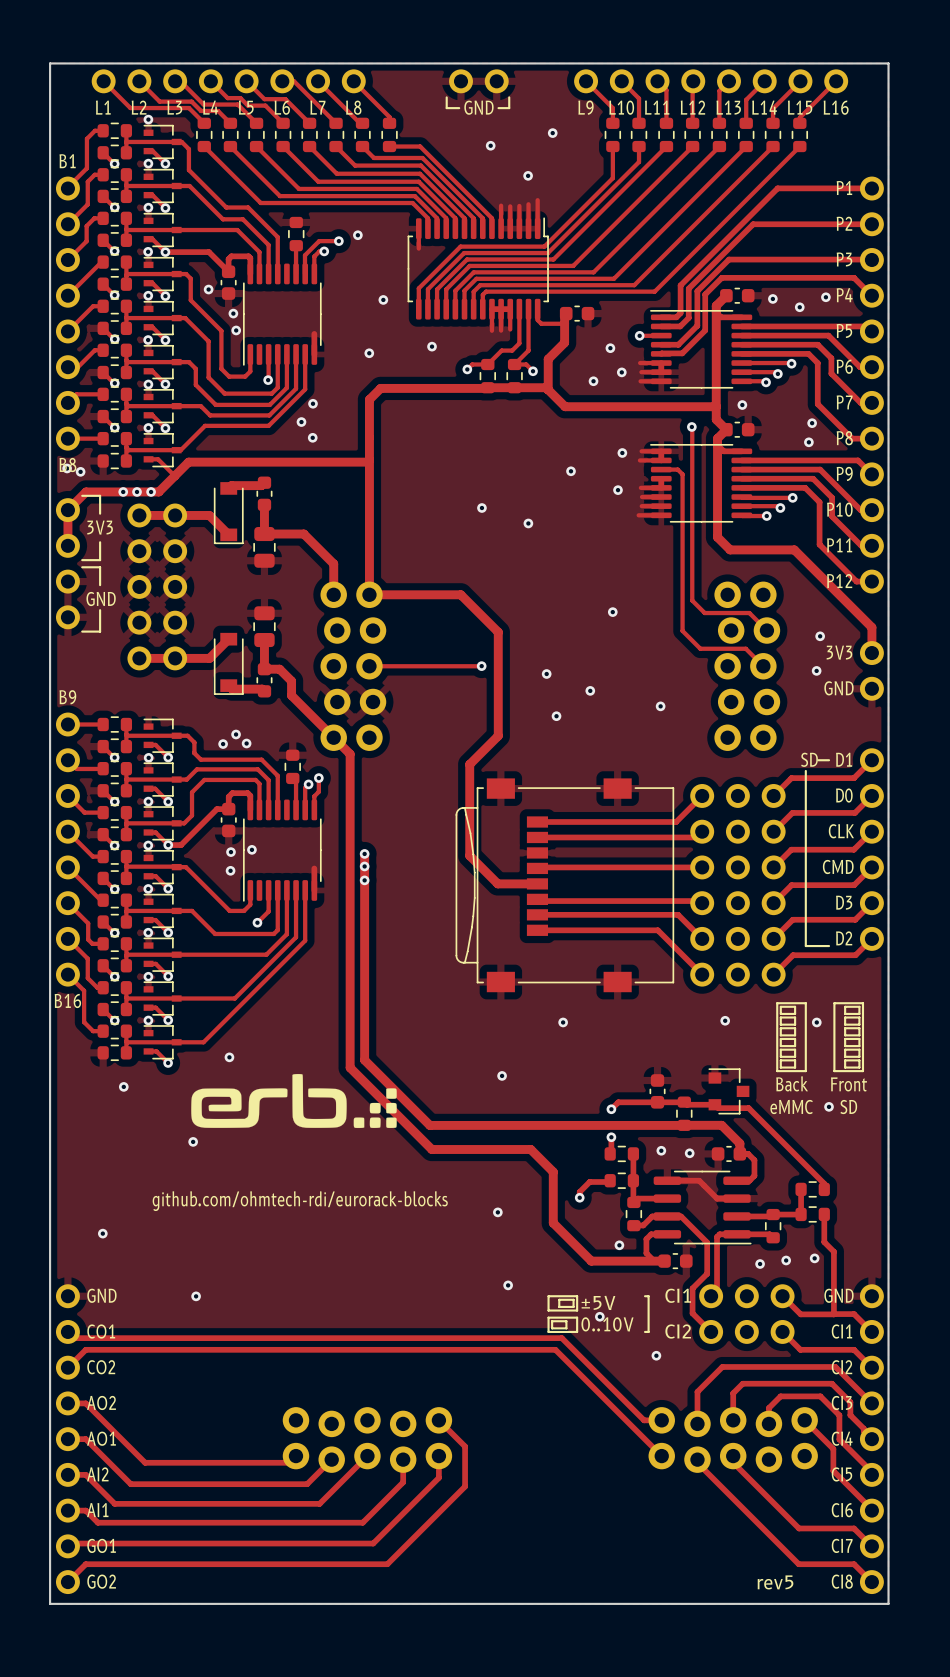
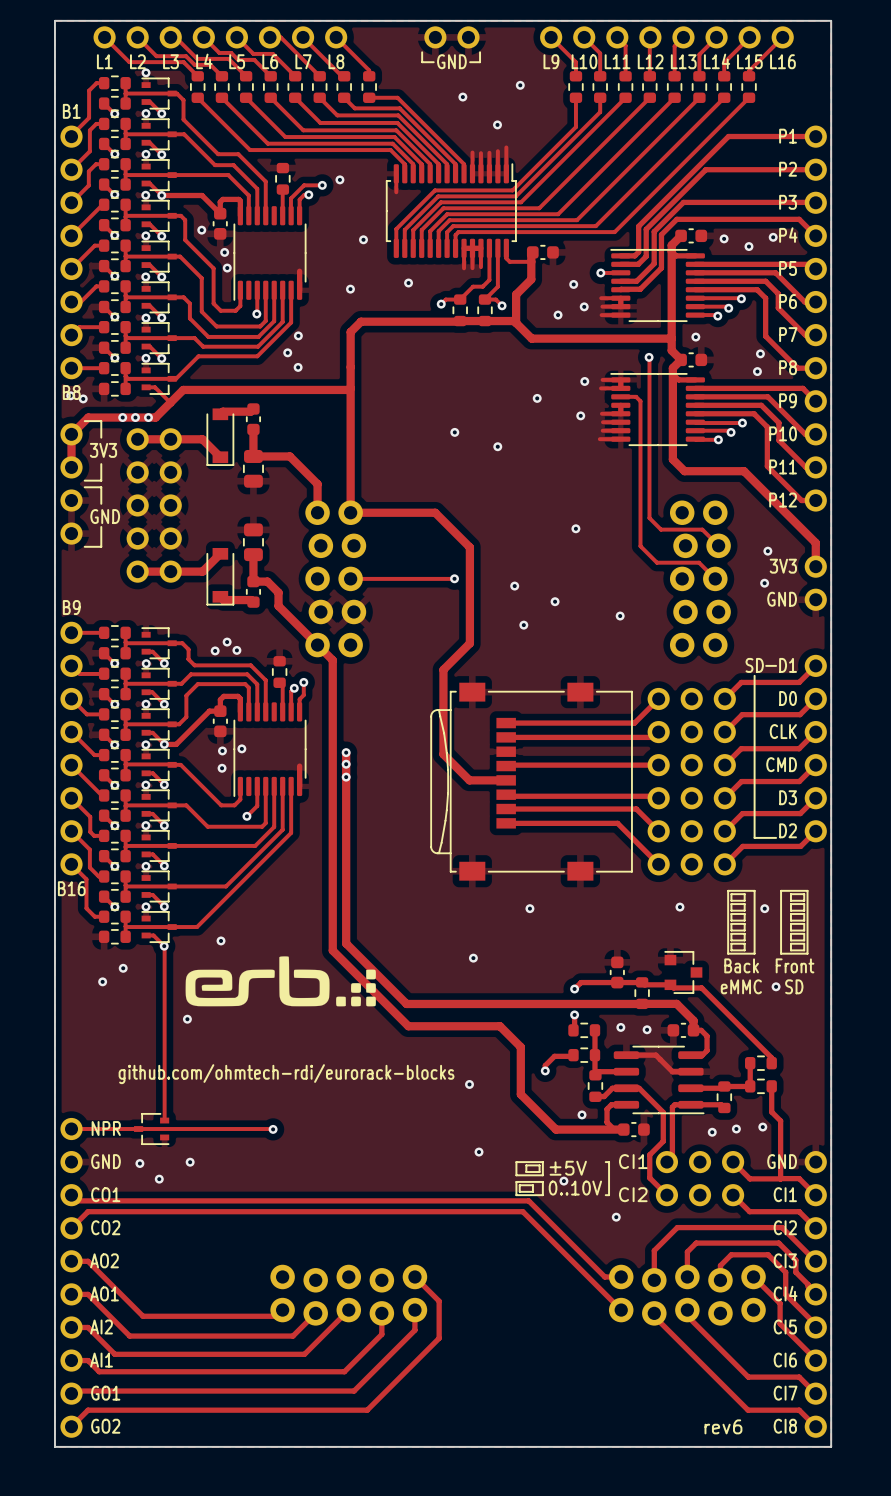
track: none -> (164, 946) (164, 1120)
via: none -> (102, 981)
via: (102, 1233) -> none
text: none -> NPR (106, 1128)
track: none -> (71, 1129) (273, 1129)
part: none -> (151, 1129)
via: none -> (273, 1129)
via: none -> (139, 1163)
via: none -> (159, 1179)
part: none -> (71, 1277)
part: (67, 1439) -> none
text: rev5 (775, 1582) -> rev6 (723, 1426)

